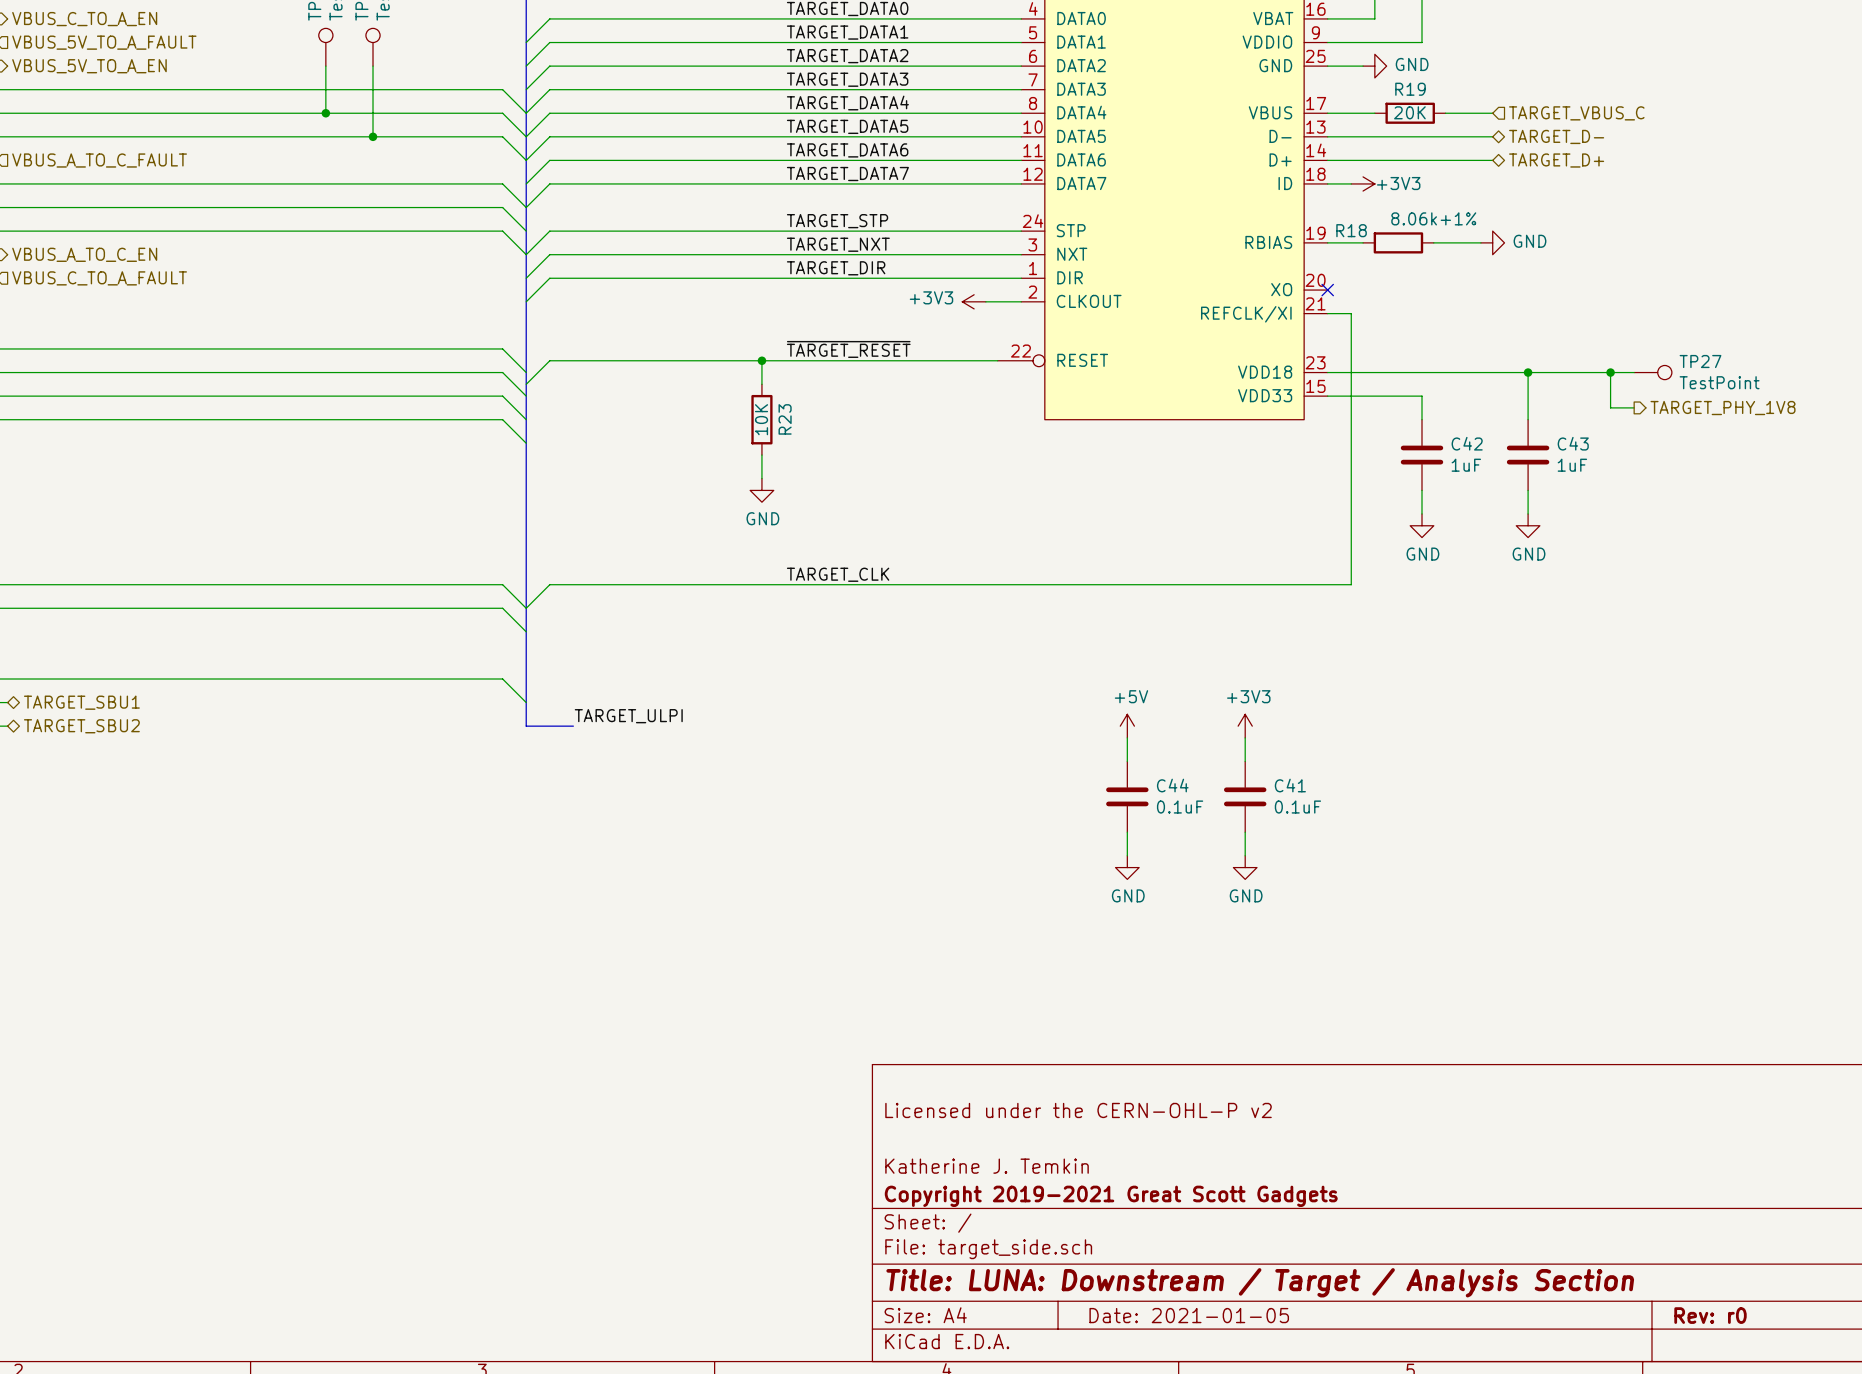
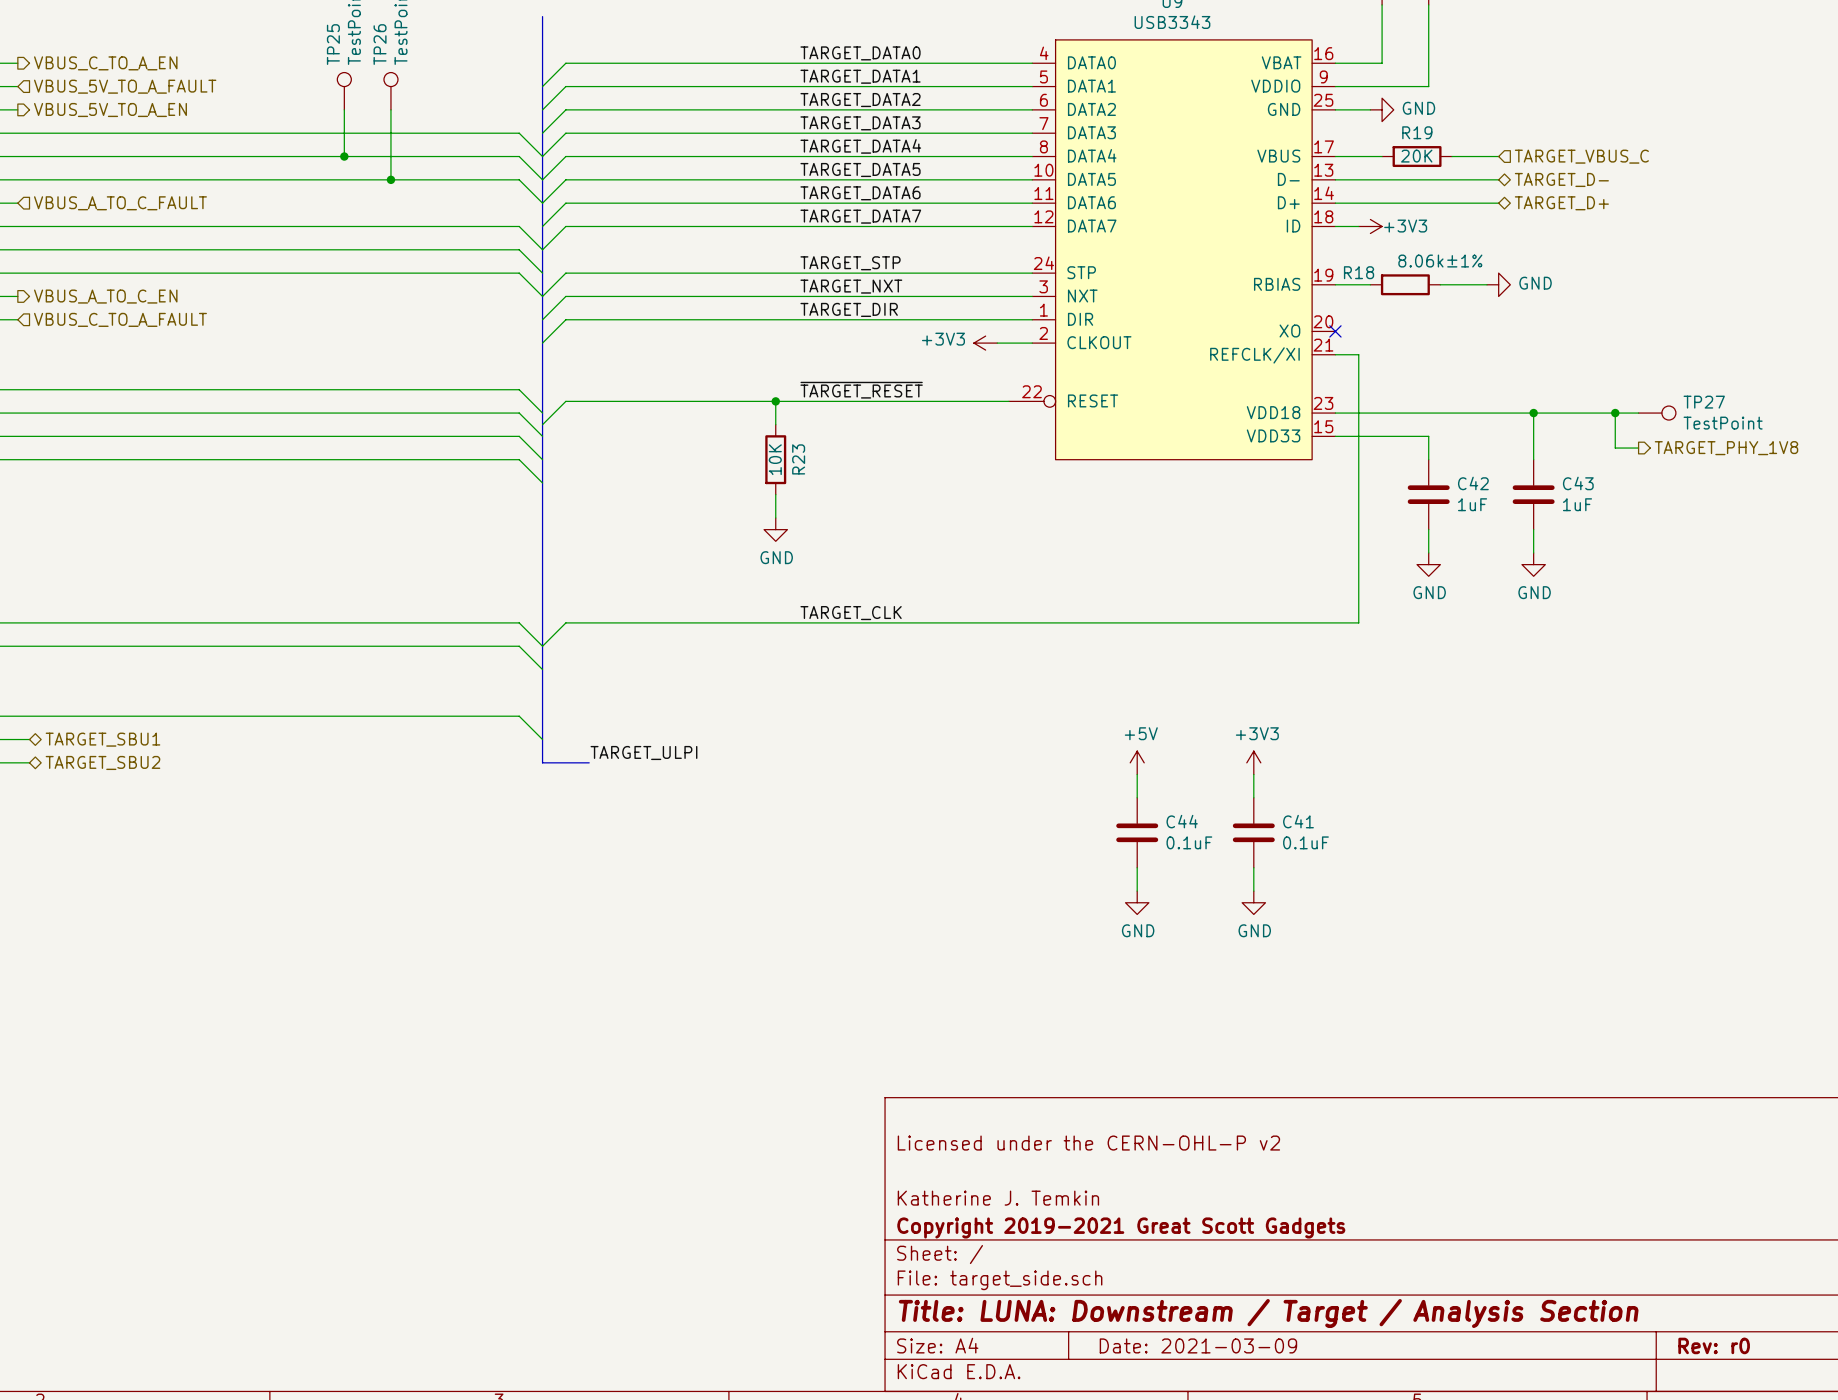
R18 value: 8.06k+1% (1433, 218) -> 8.06k±1% (1440, 261)
title block: Date: 2021-01-05 (1189, 1315) -> Date: 2021-03-09 (1198, 1345)

